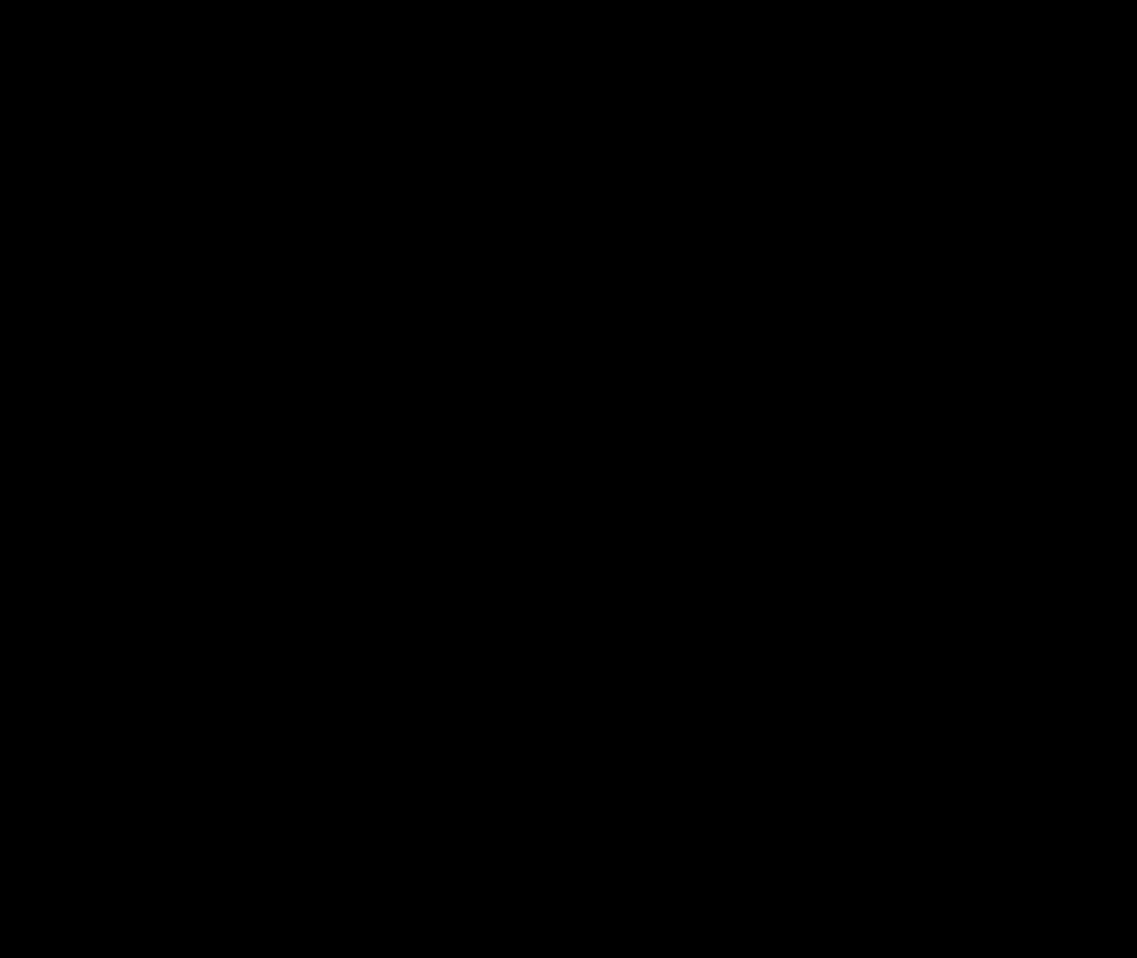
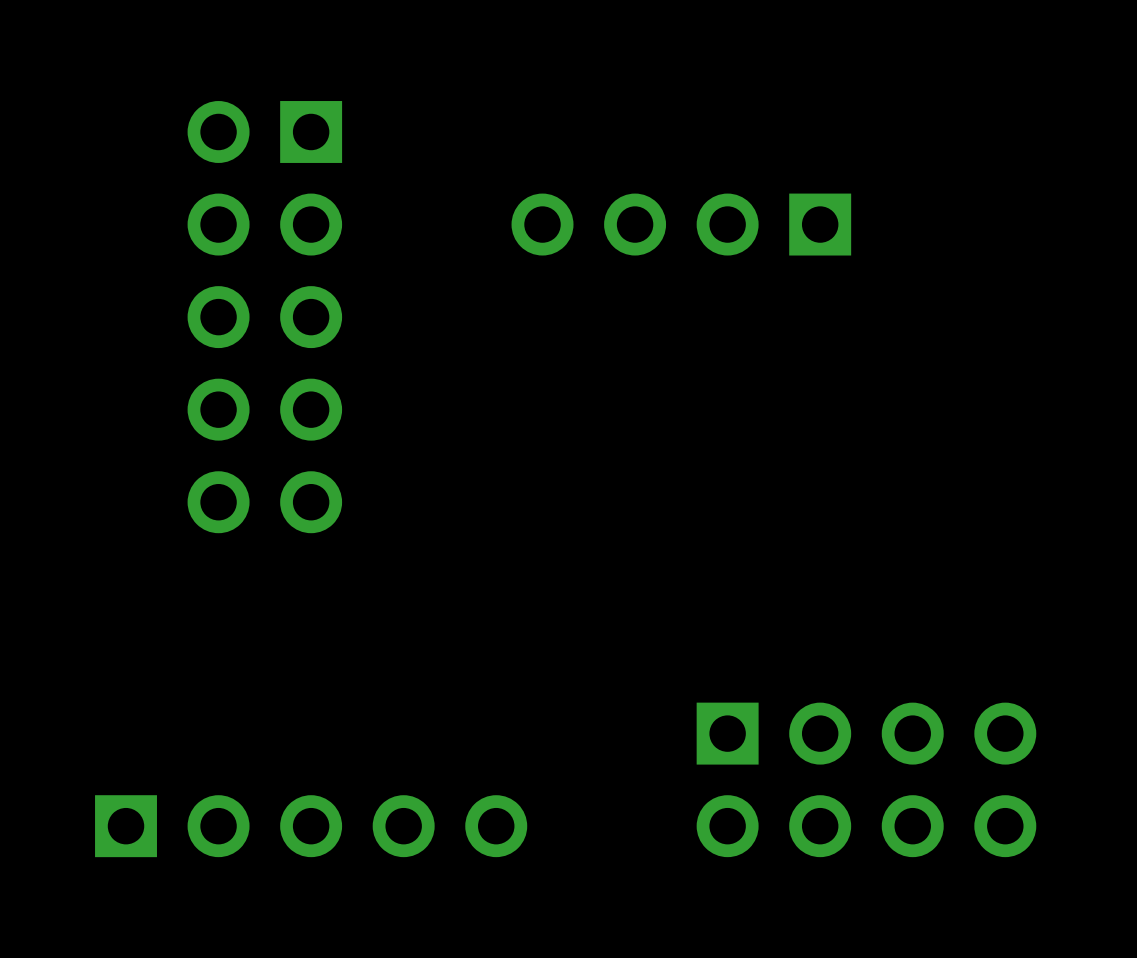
part: none -> (681, 224)
part: none -> (264, 317)
part: none -> (866, 779)
part: none -> (311, 826)

